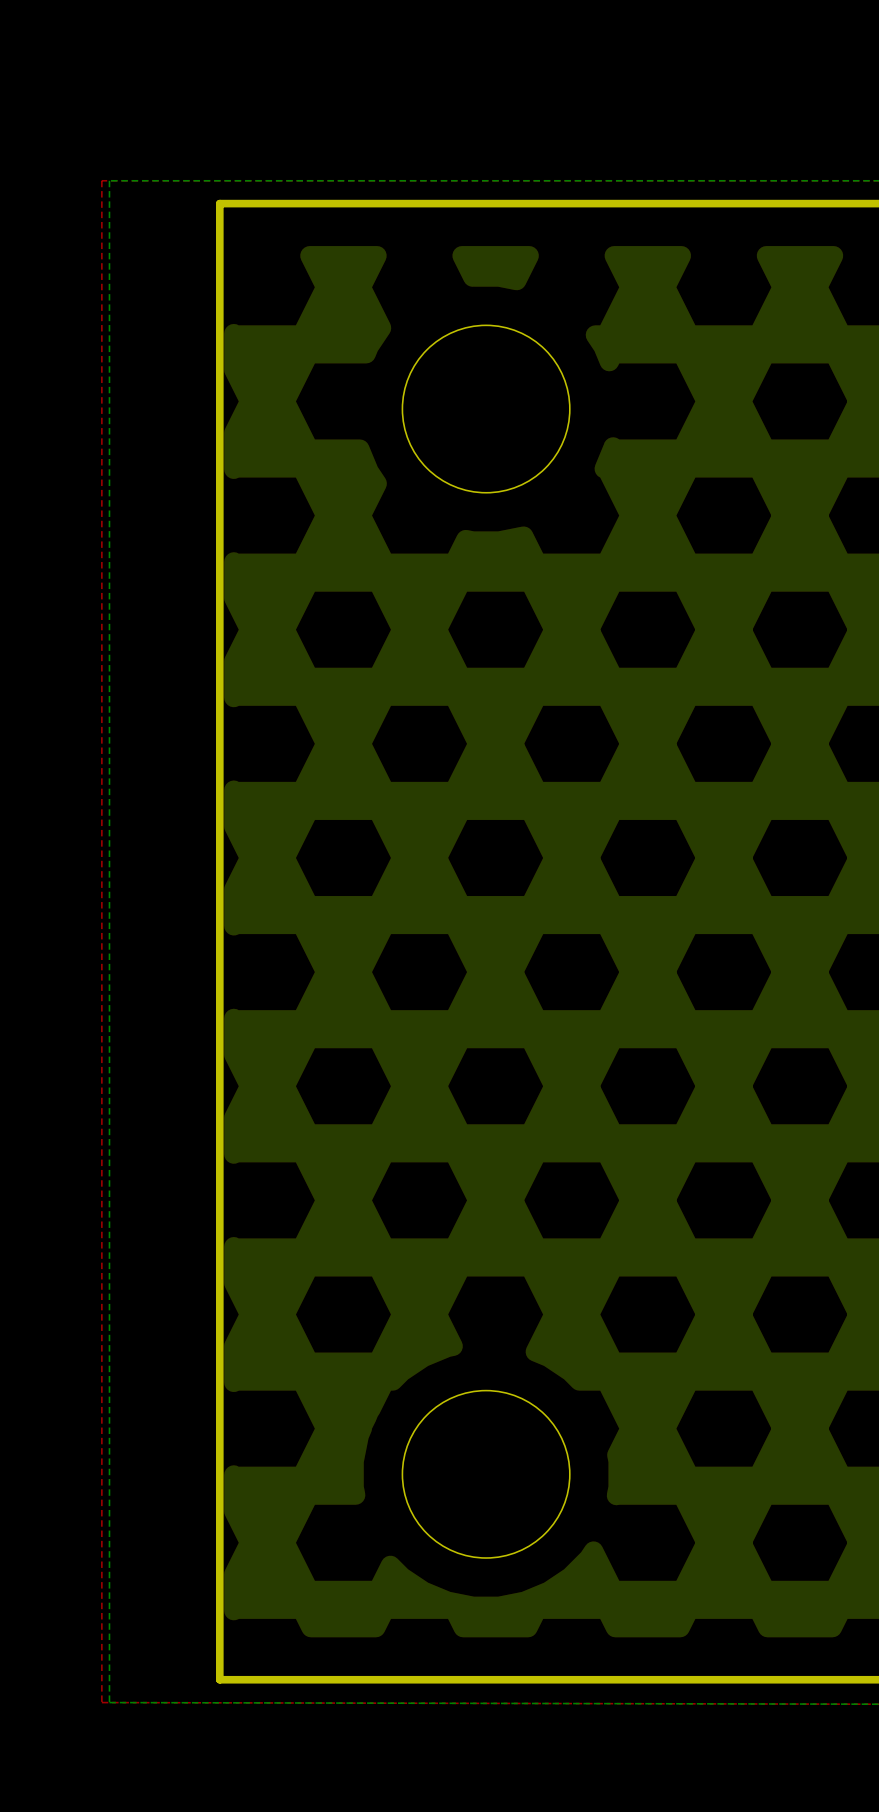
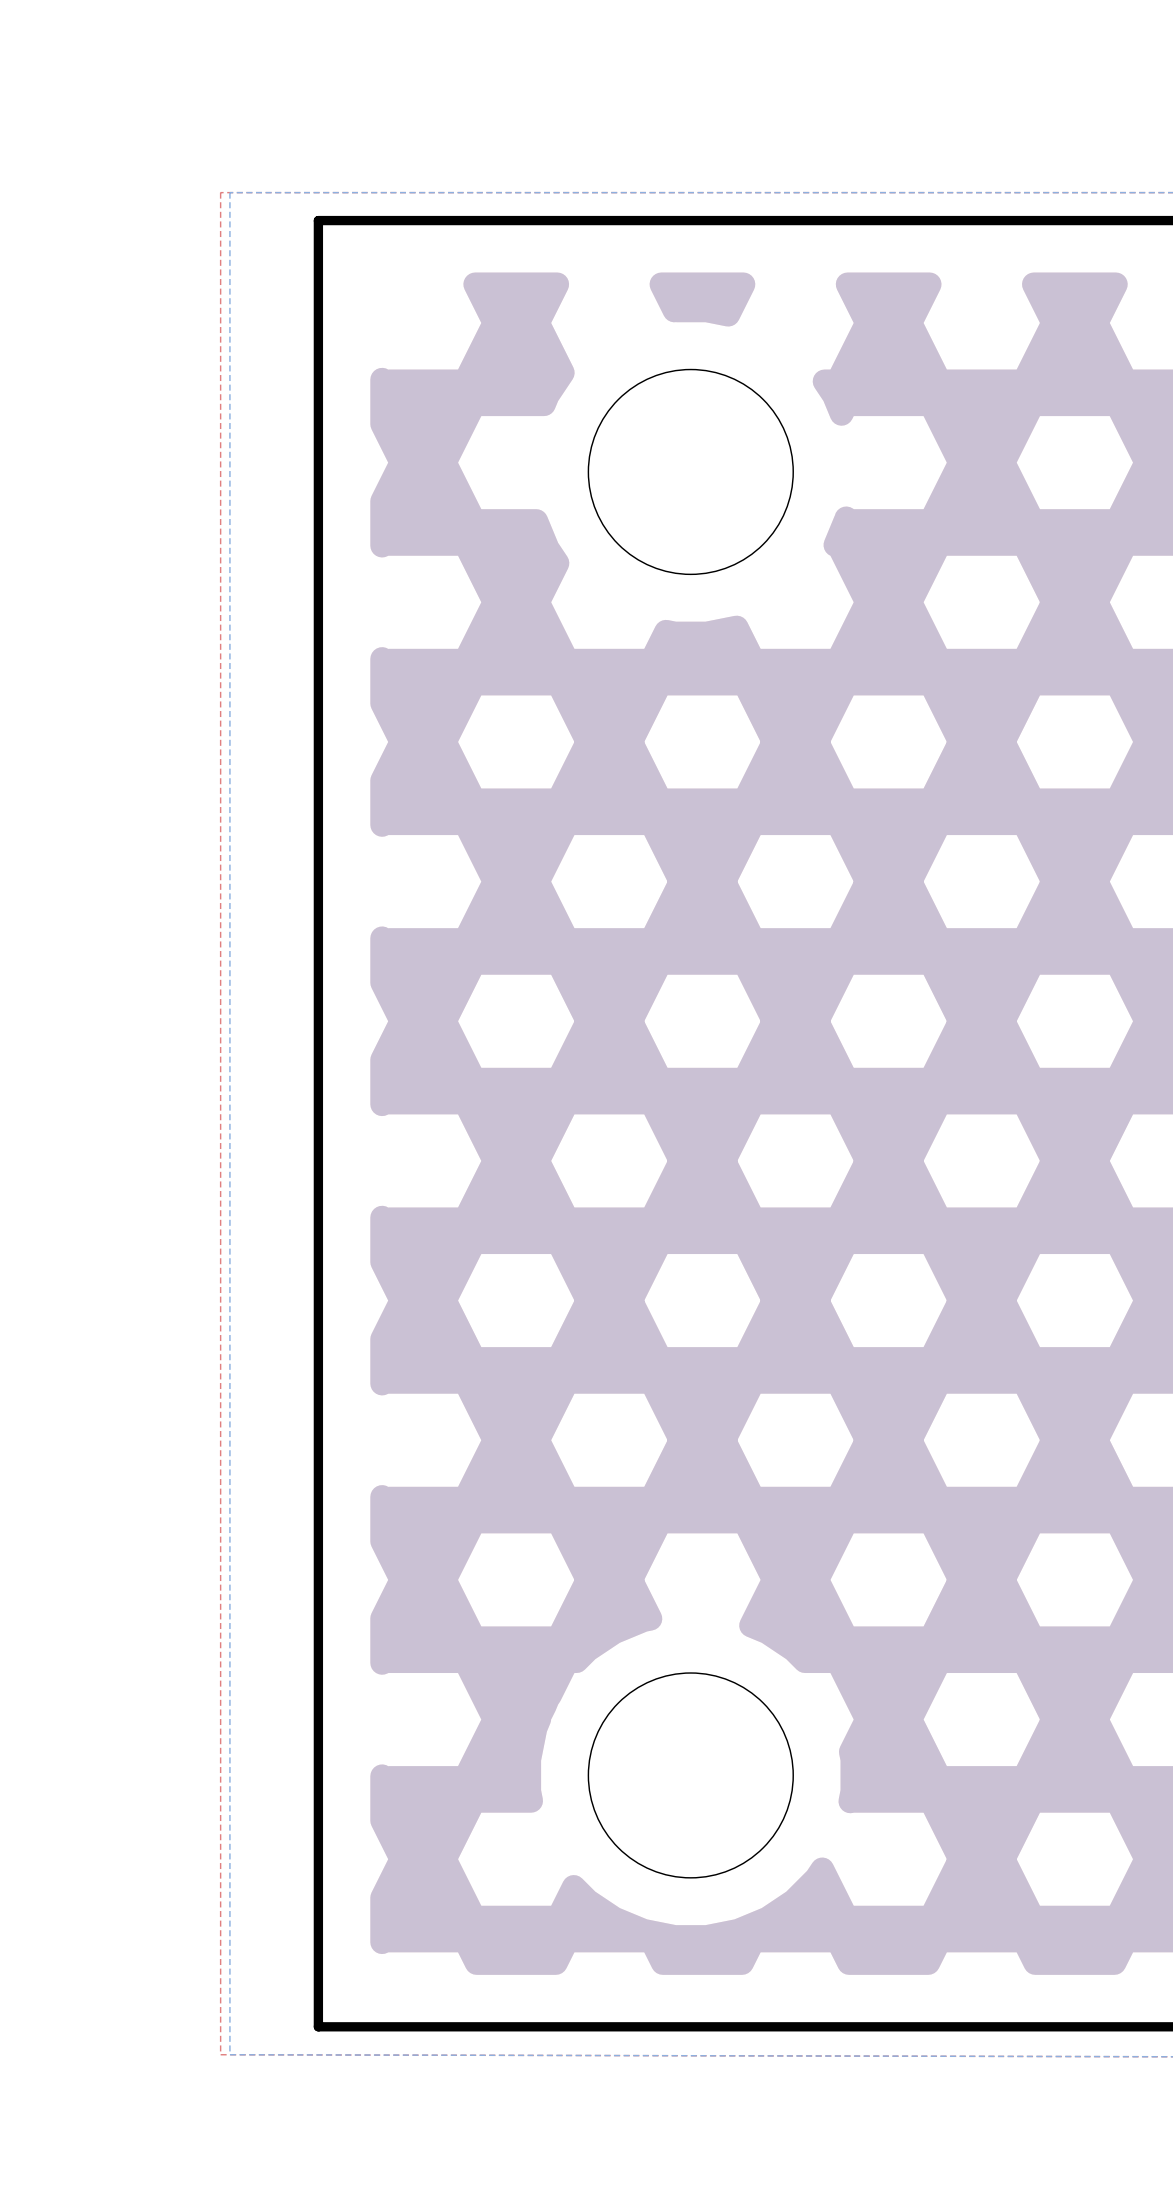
board edge: (219, 203) (219, 1679) -> (364, 220) (318, 220) (318, 2026) (364, 2026)

